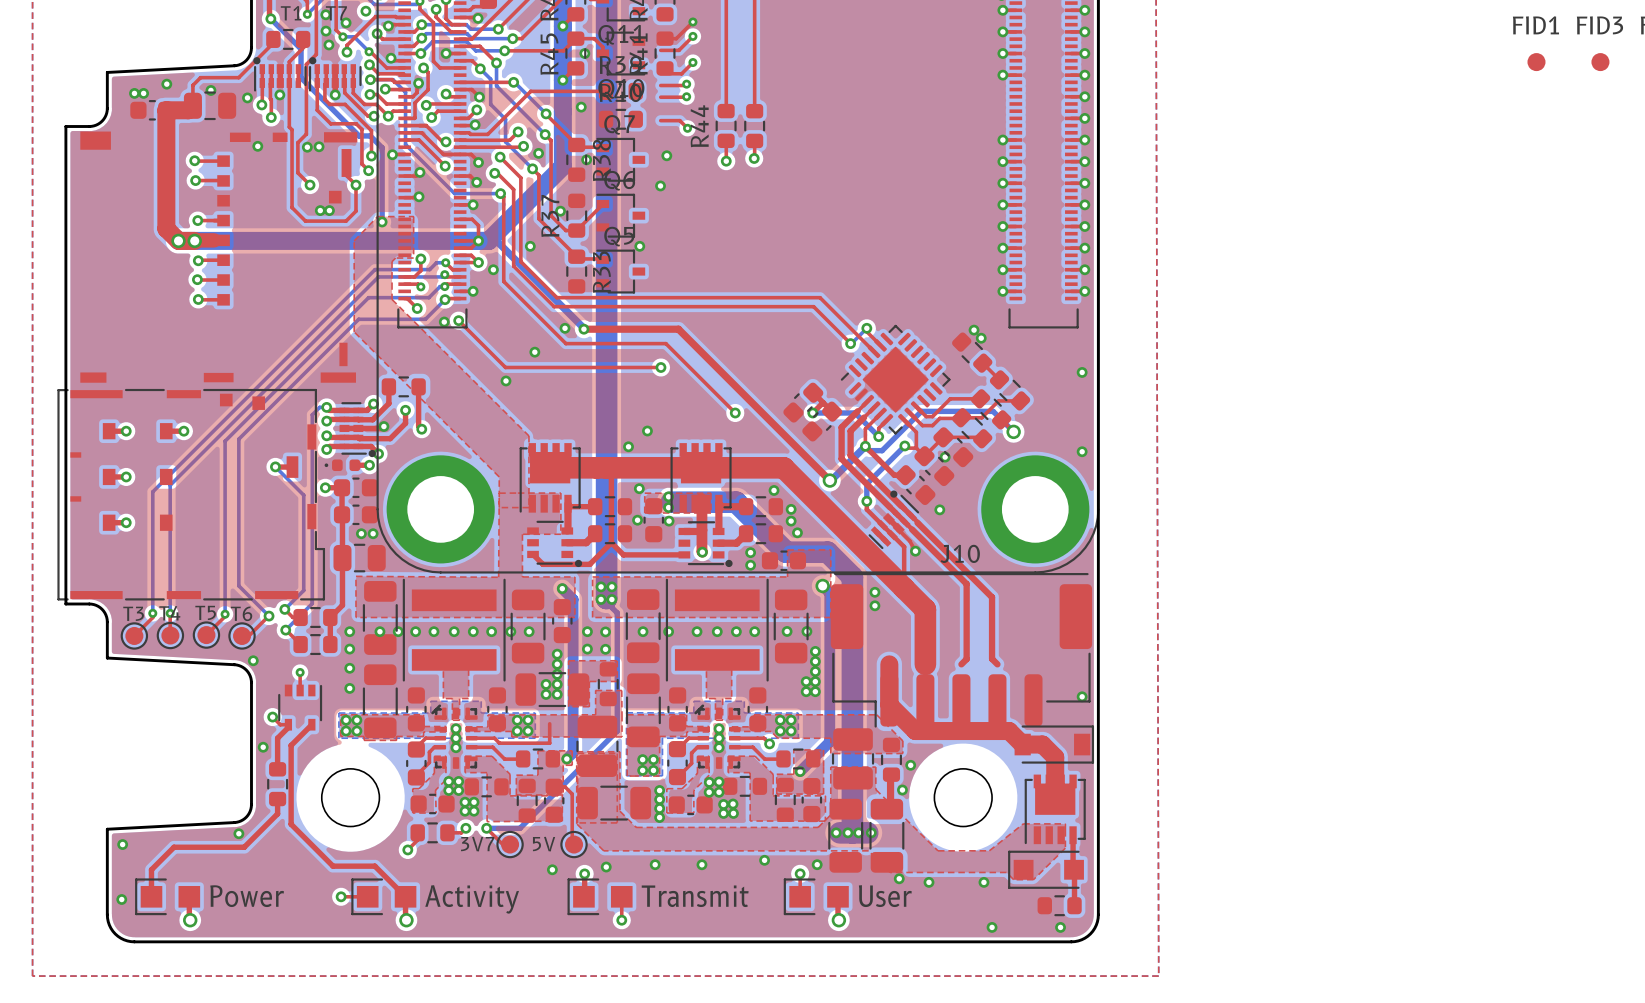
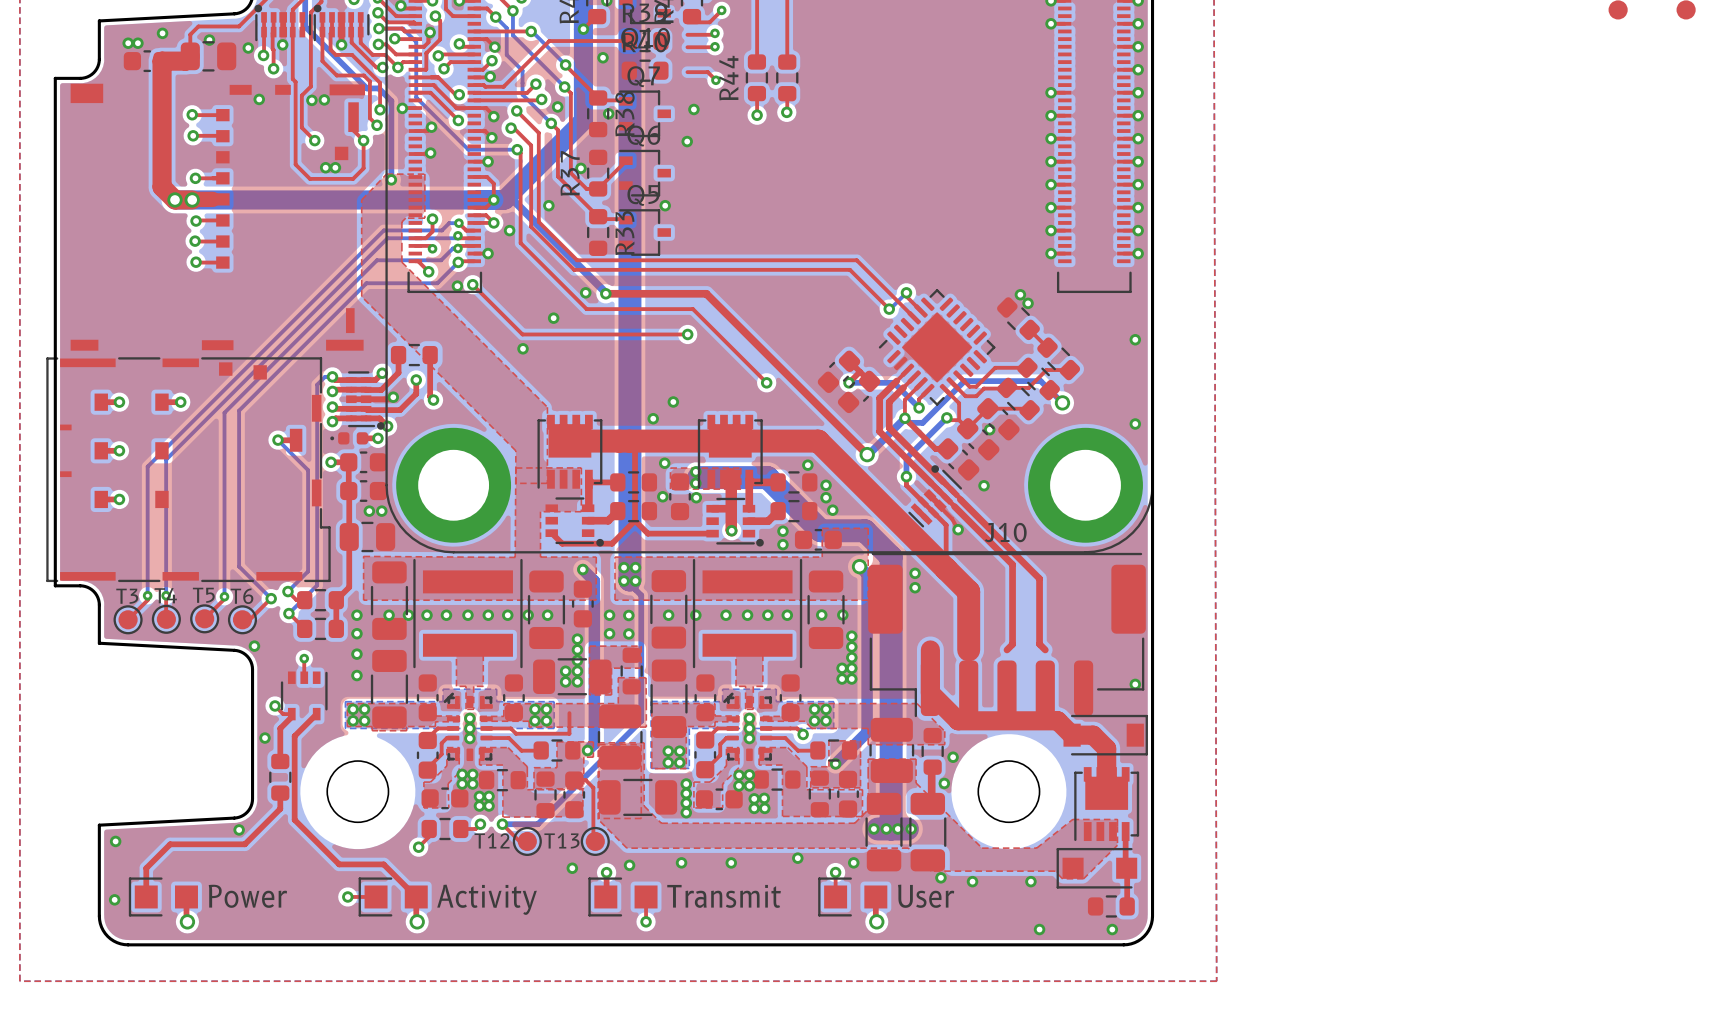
3V7 name: 3V7 (477, 844) -> T12 (492, 840)
5V name: 5V (544, 844) -> T13 (561, 840)

